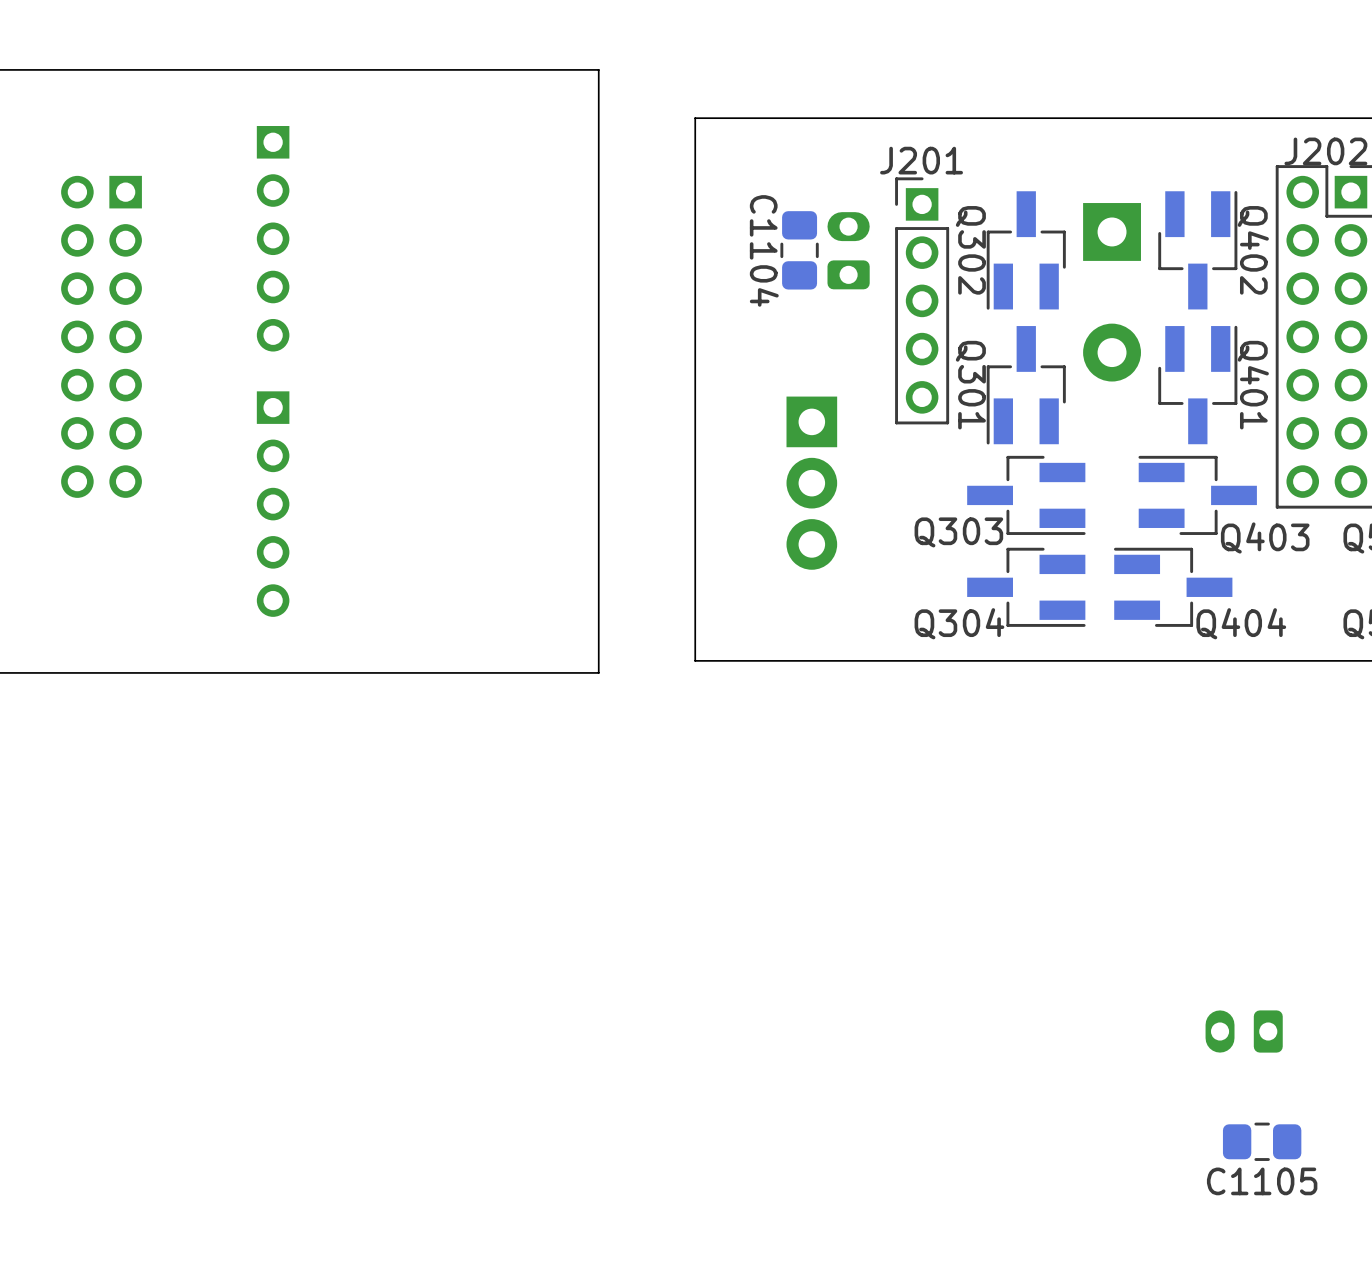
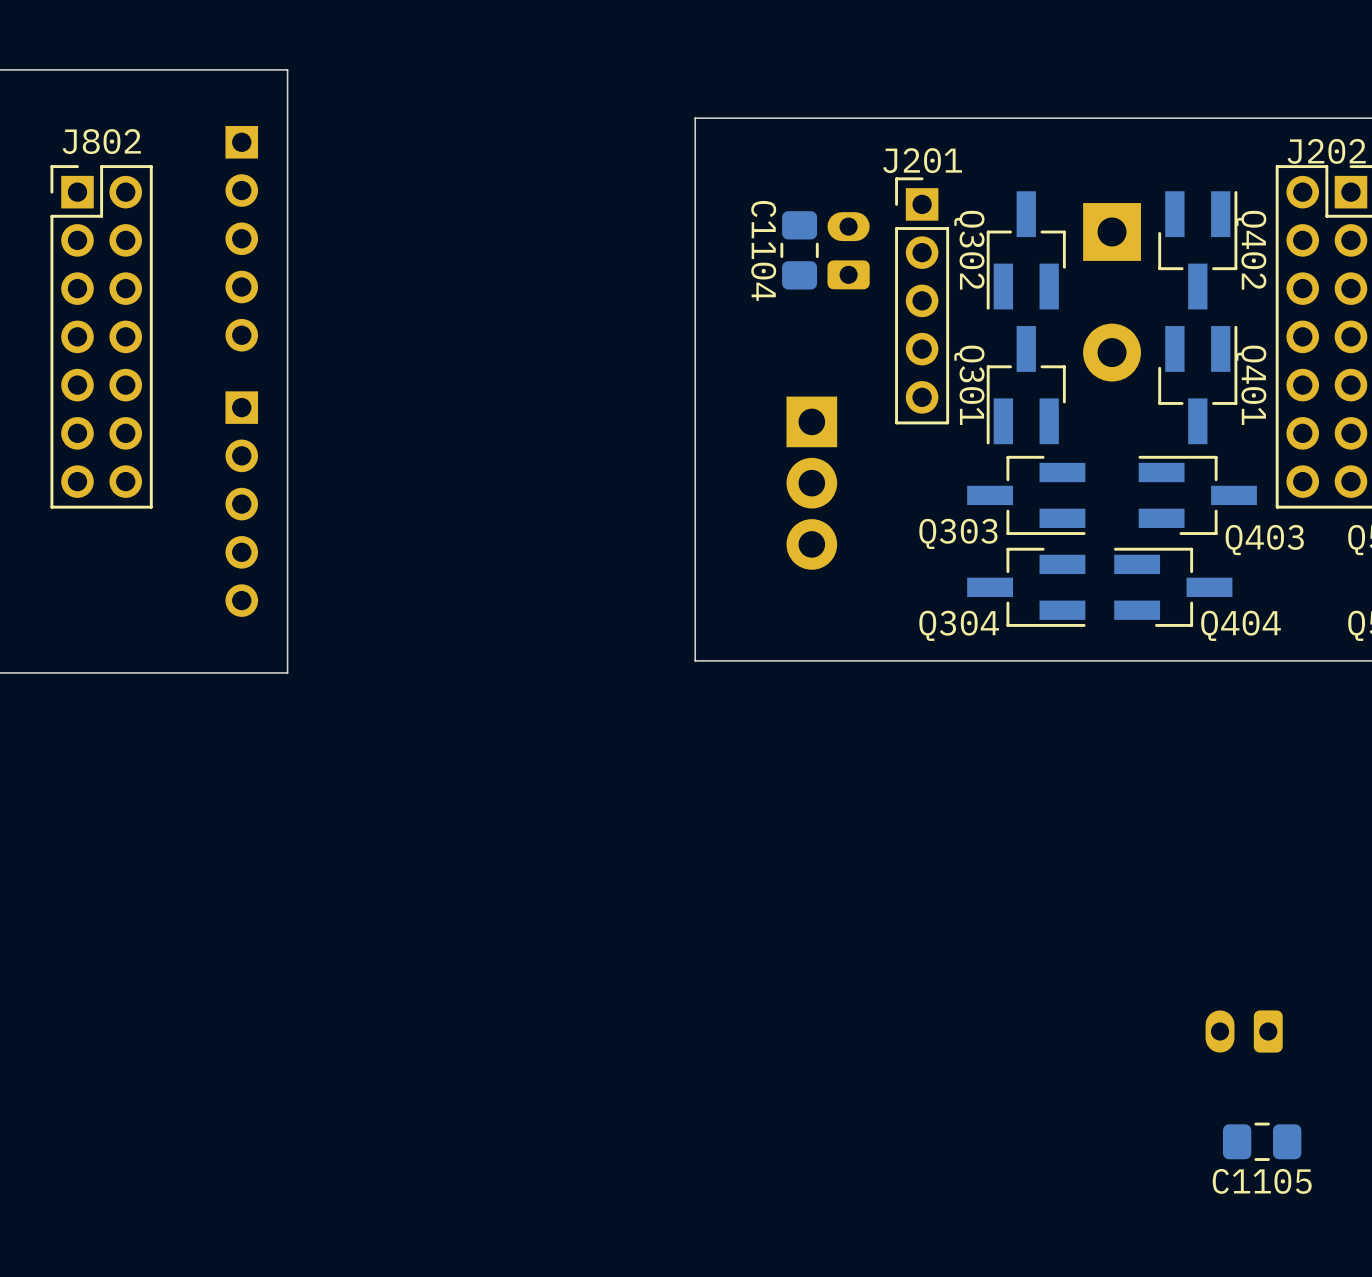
board edge: (287, 69) (598, 69) (598, 672) (287, 672) -> (287, 69) (287, 672)
part position: (273, 238) -> (241, 238)
J802 side: top (101, 336) -> bottom (101, 336)
part position: (273, 504) -> (241, 504)

